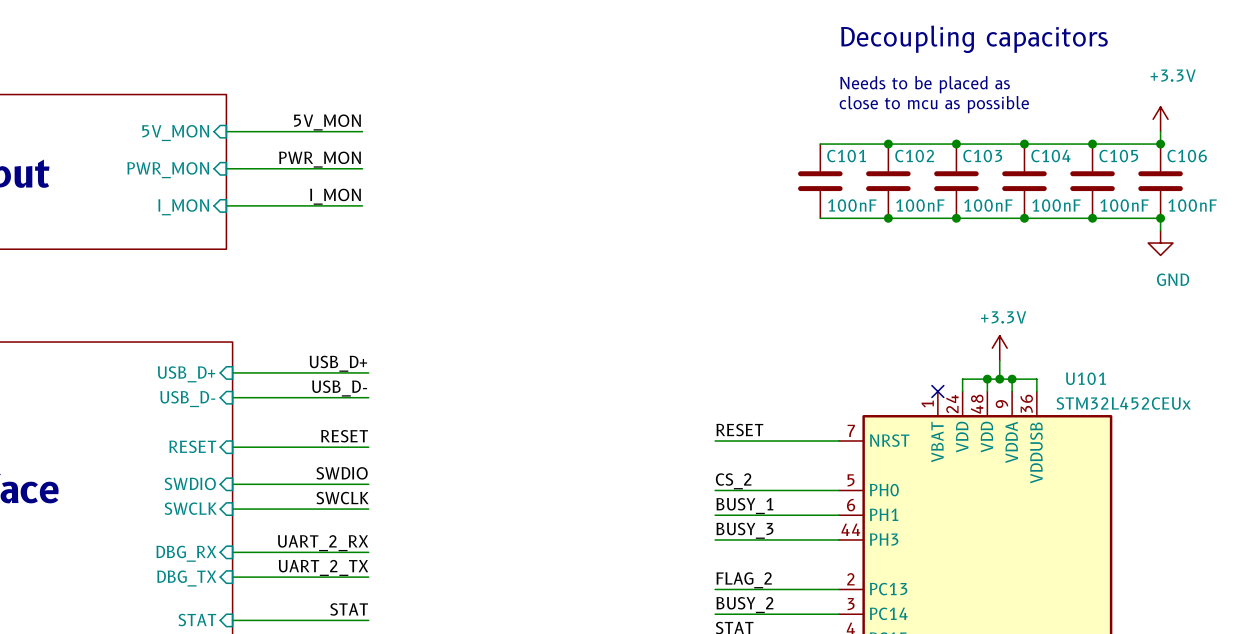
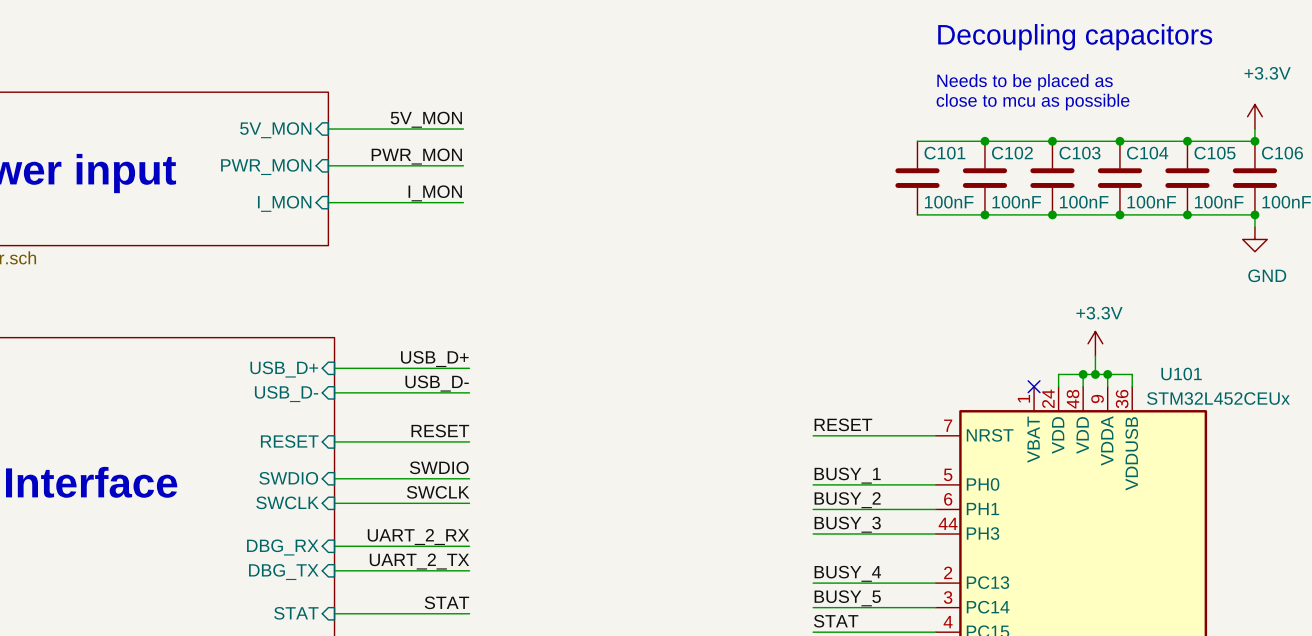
label: CS_2 (733, 481) -> BUSY_1 (847, 475)
label: BUSY_1 (744, 506) -> BUSY_2 (847, 500)
label: FLAG_2 (744, 580) -> BUSY_4 (847, 573)
label: BUSY_2 (744, 605) -> BUSY_5 (847, 598)

